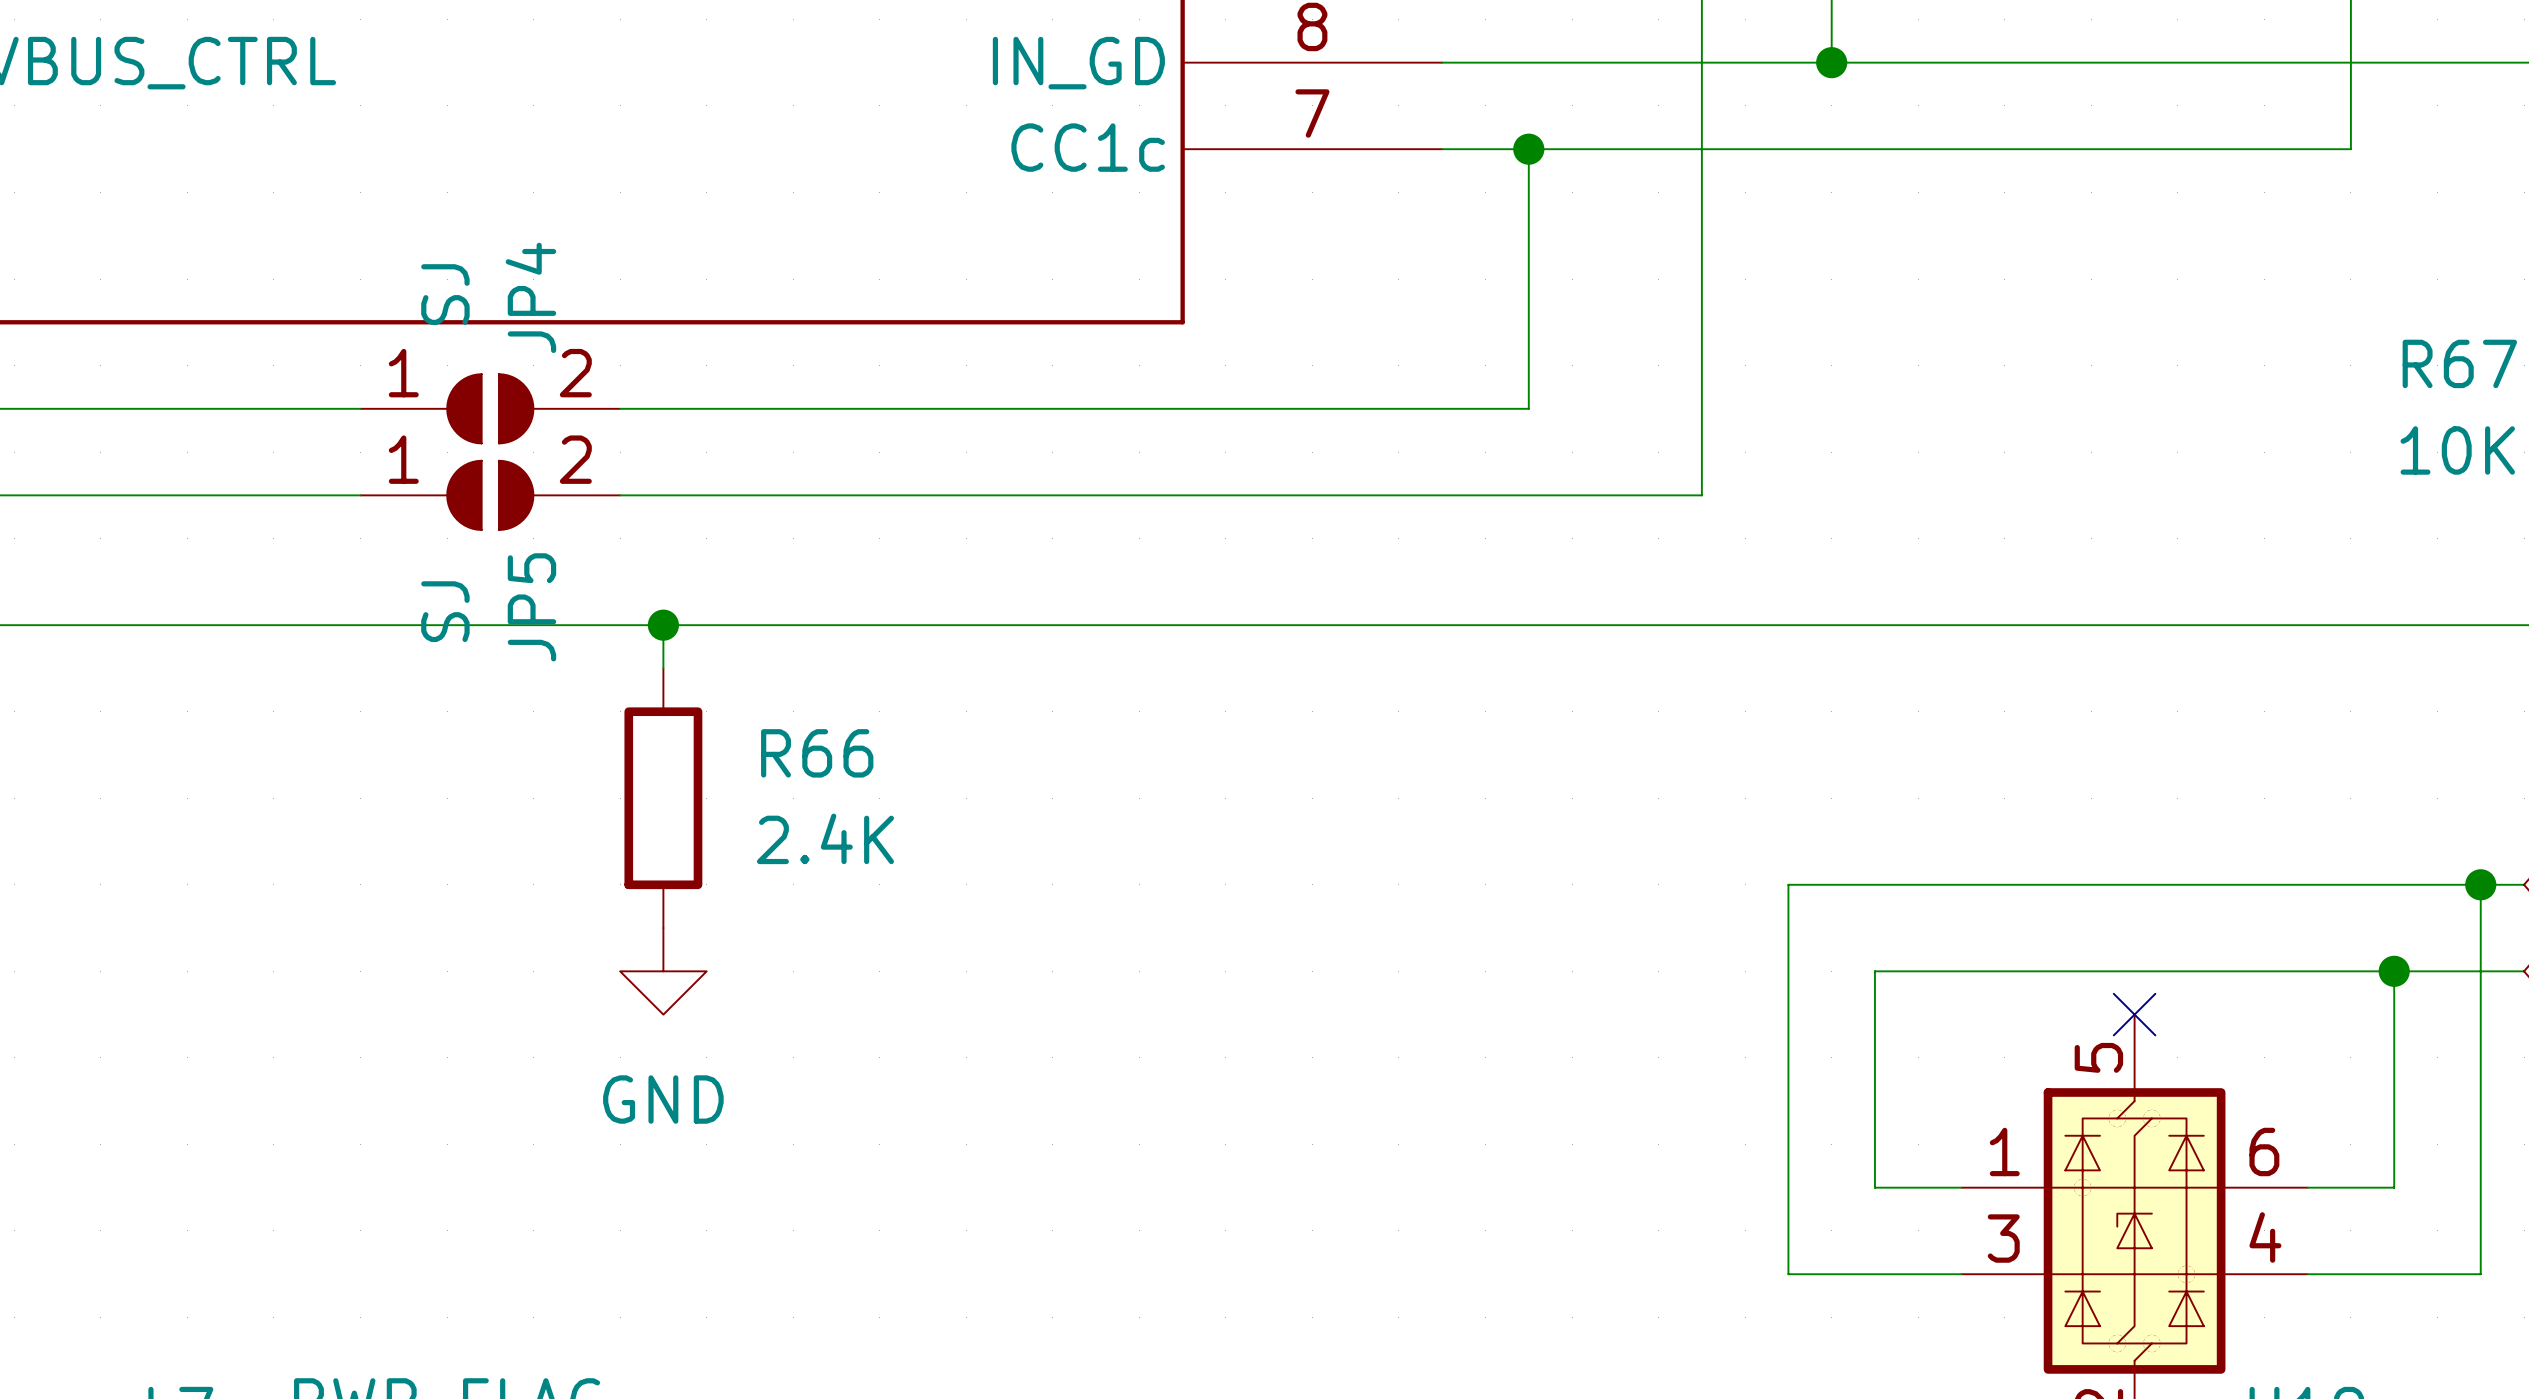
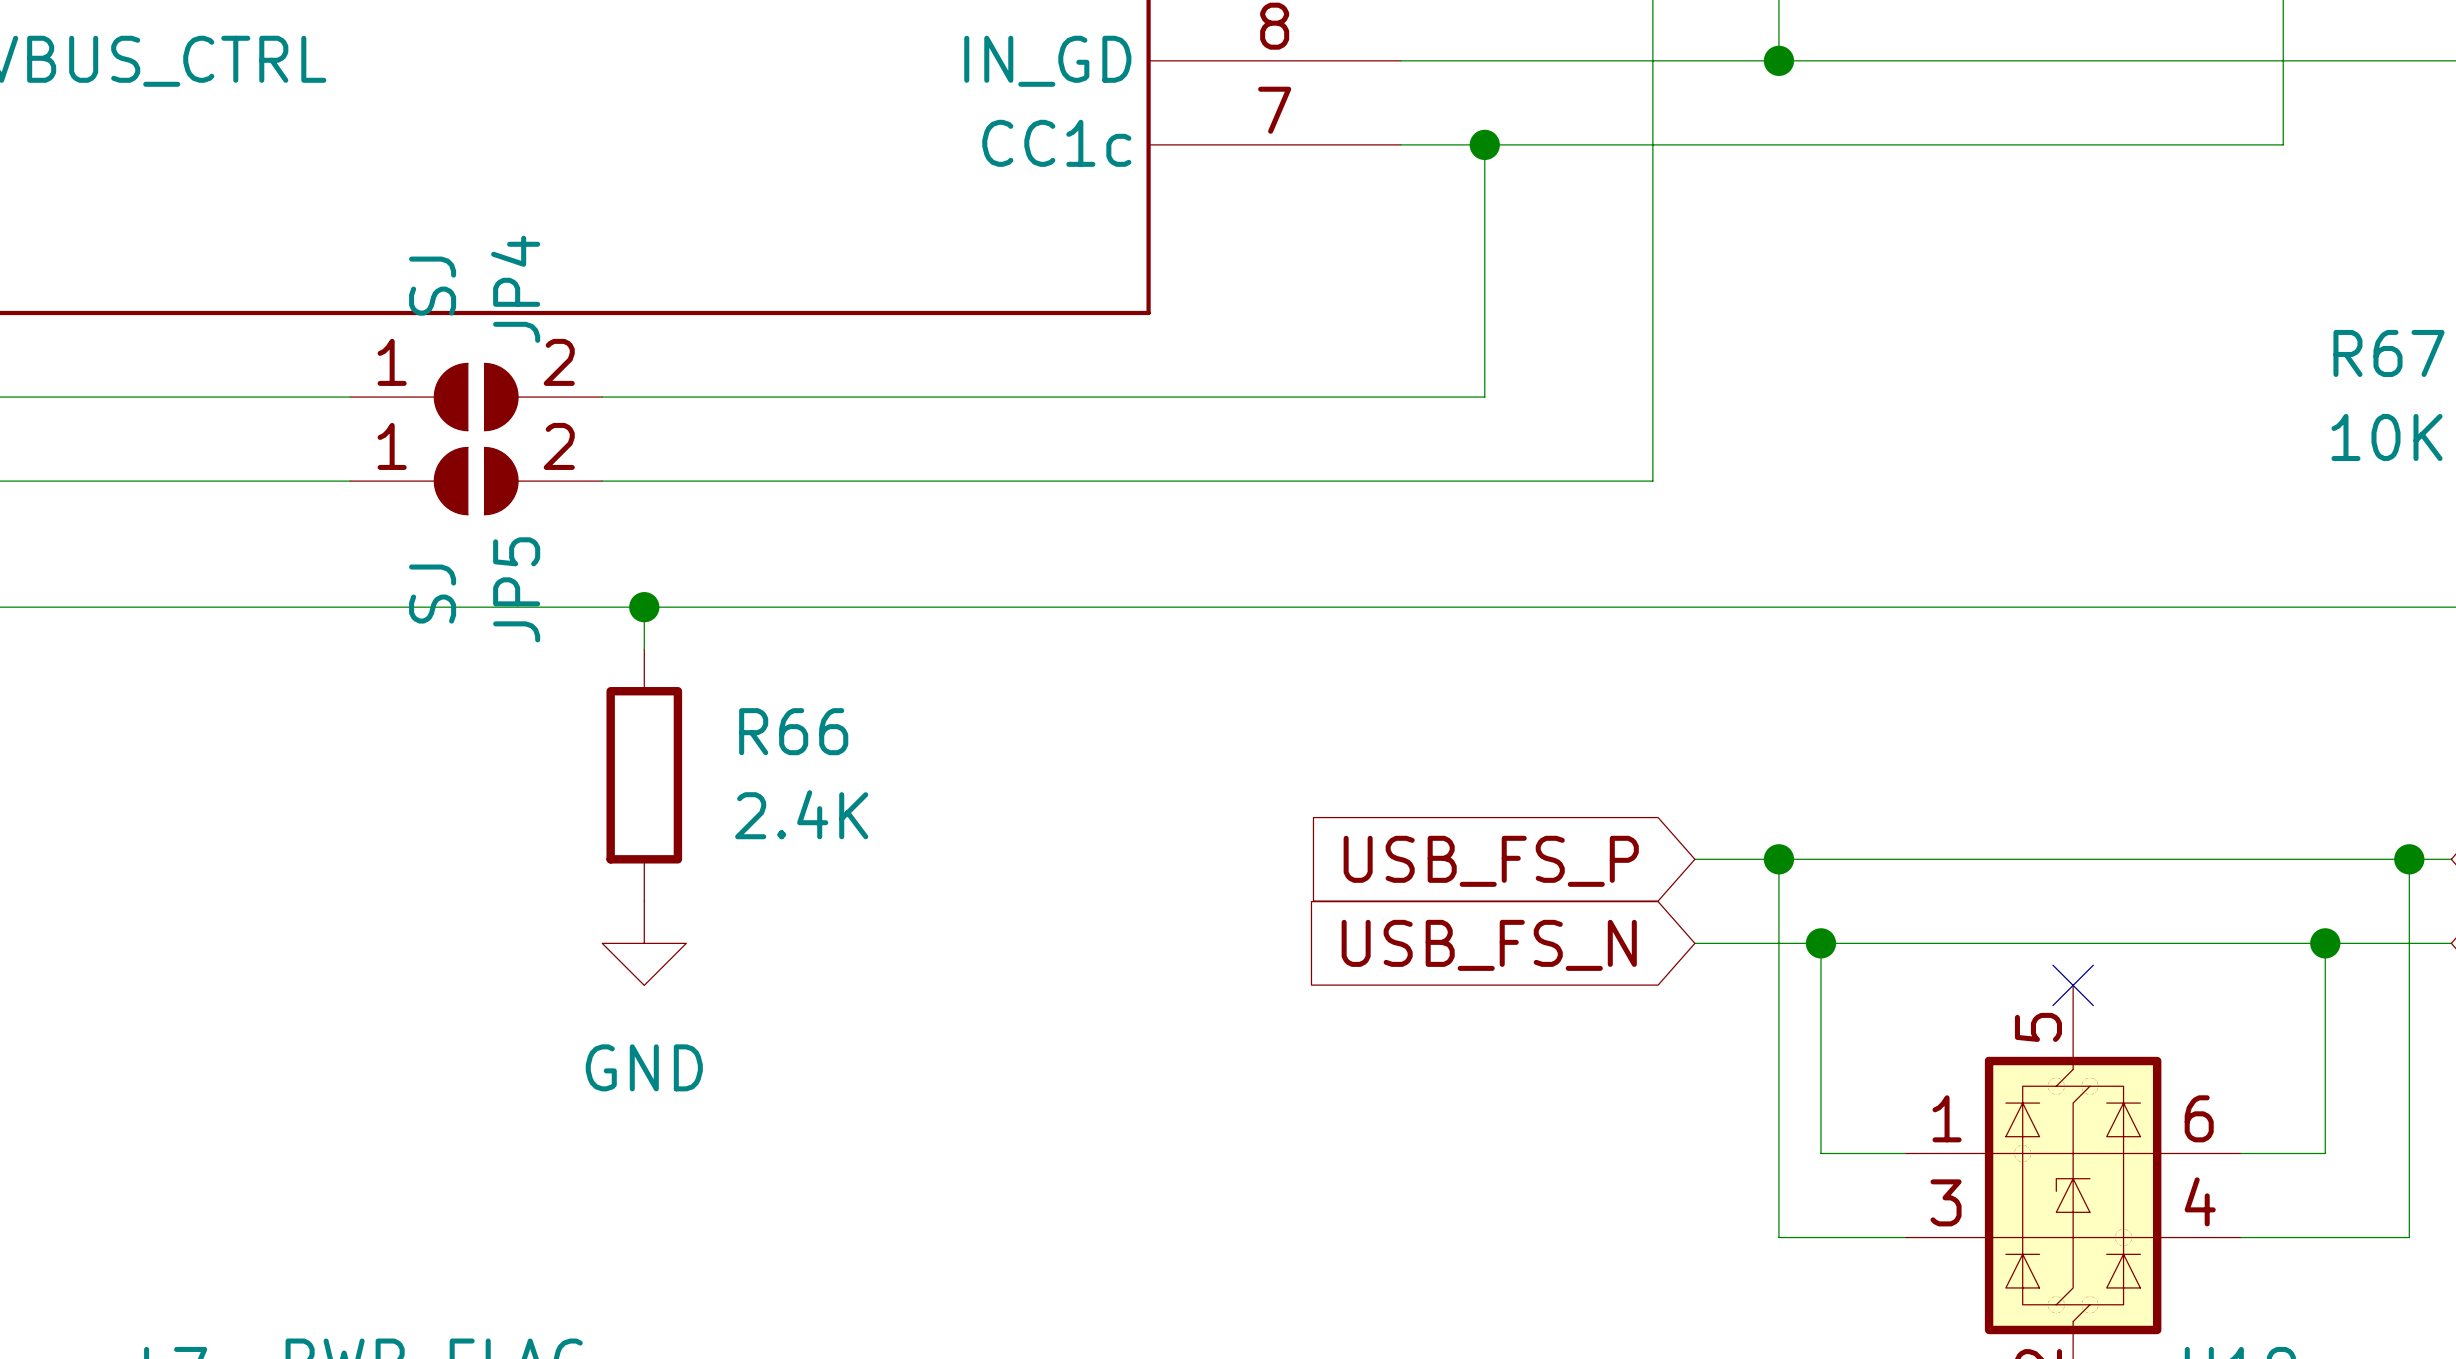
wire: none -> (1694, 859) (1736, 859)
wire: (1788, 884) (1788, 1274) (1831, 1274) -> (1778, 859) (1778, 1237)
junction: none -> (1778, 859)
global label: none -> USB_FS_P (1491, 861)
wire: none -> (1694, 943) (1820, 943)
junction: none -> (1820, 943)
global label: none -> USB_FS_N (1489, 945)

